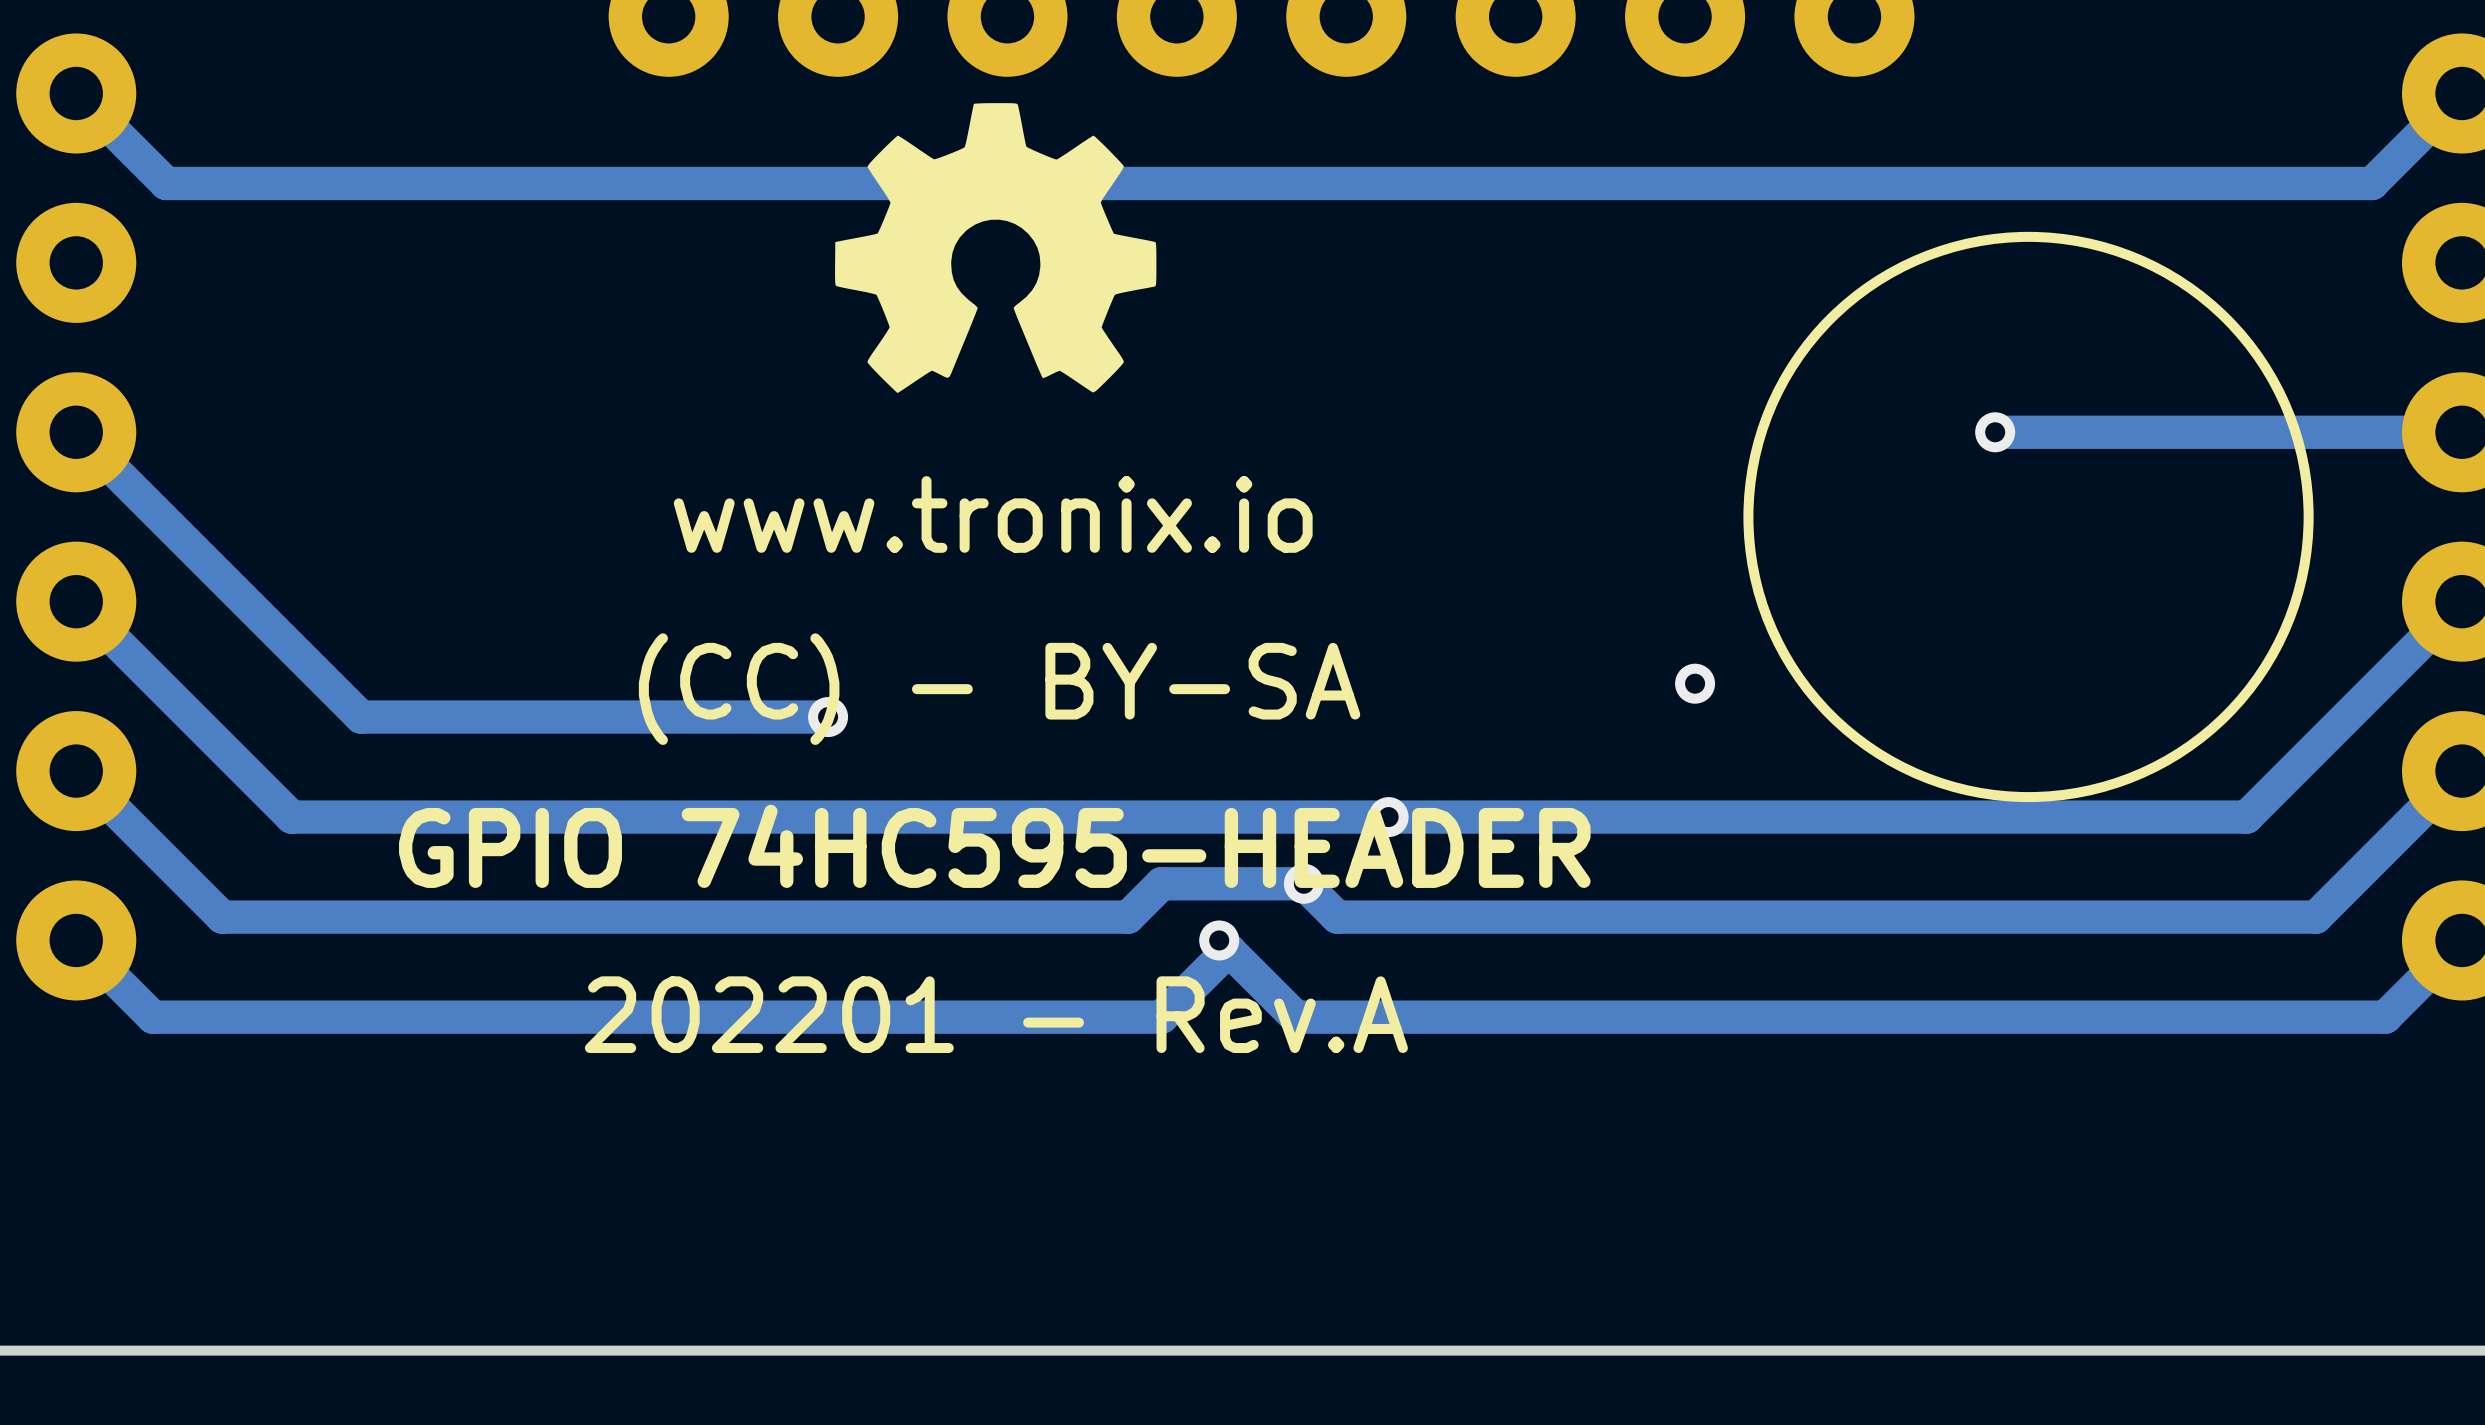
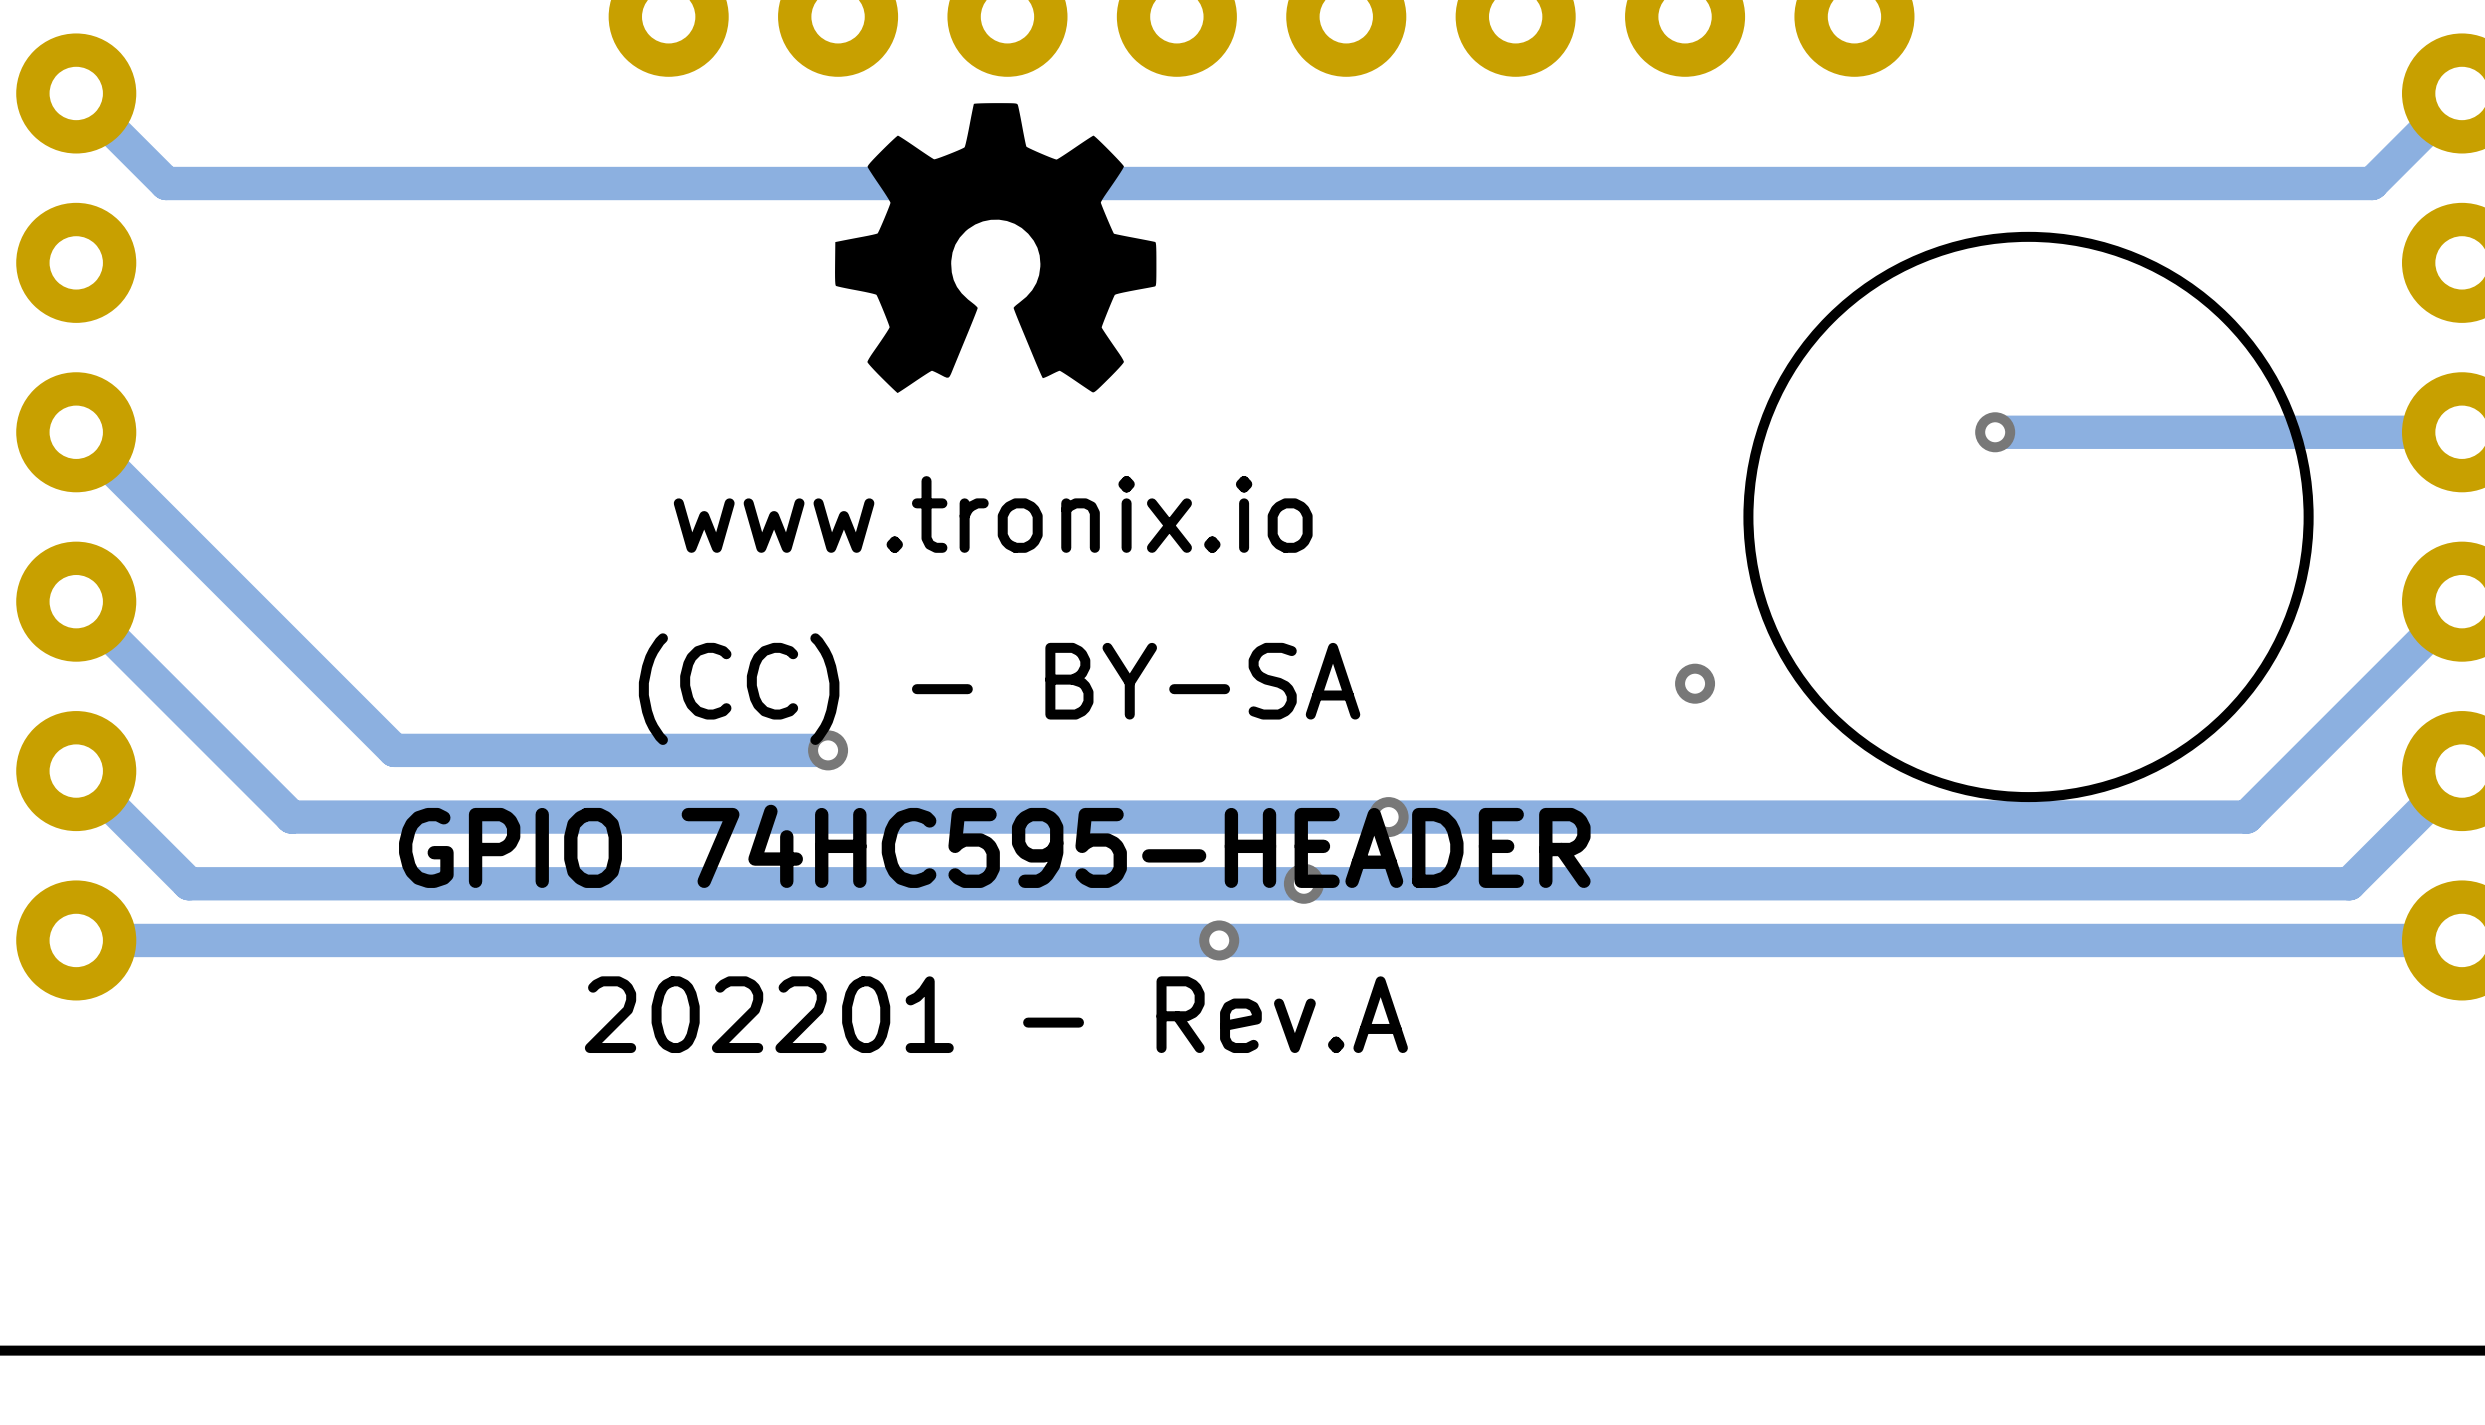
track: (828, 717) (361, 717) -> (828, 750) (394, 750) (361, 717)
via position: (828, 717) -> (828, 750)
track: (1161, 883) (1128, 917) (222, 917) (188, 883) -> (1161, 883) (188, 883)
track: (2349, 883) (2315, 917) (1337, 917) (1303, 883) -> (2349, 883) (1303, 883)
track: (76, 940) (152, 1017) (1161, 1017) (1228, 949) -> none
track: (2462, 940) (2385, 1017) (1295, 1017) (1219, 940) -> (2462, 940) (76, 940)

